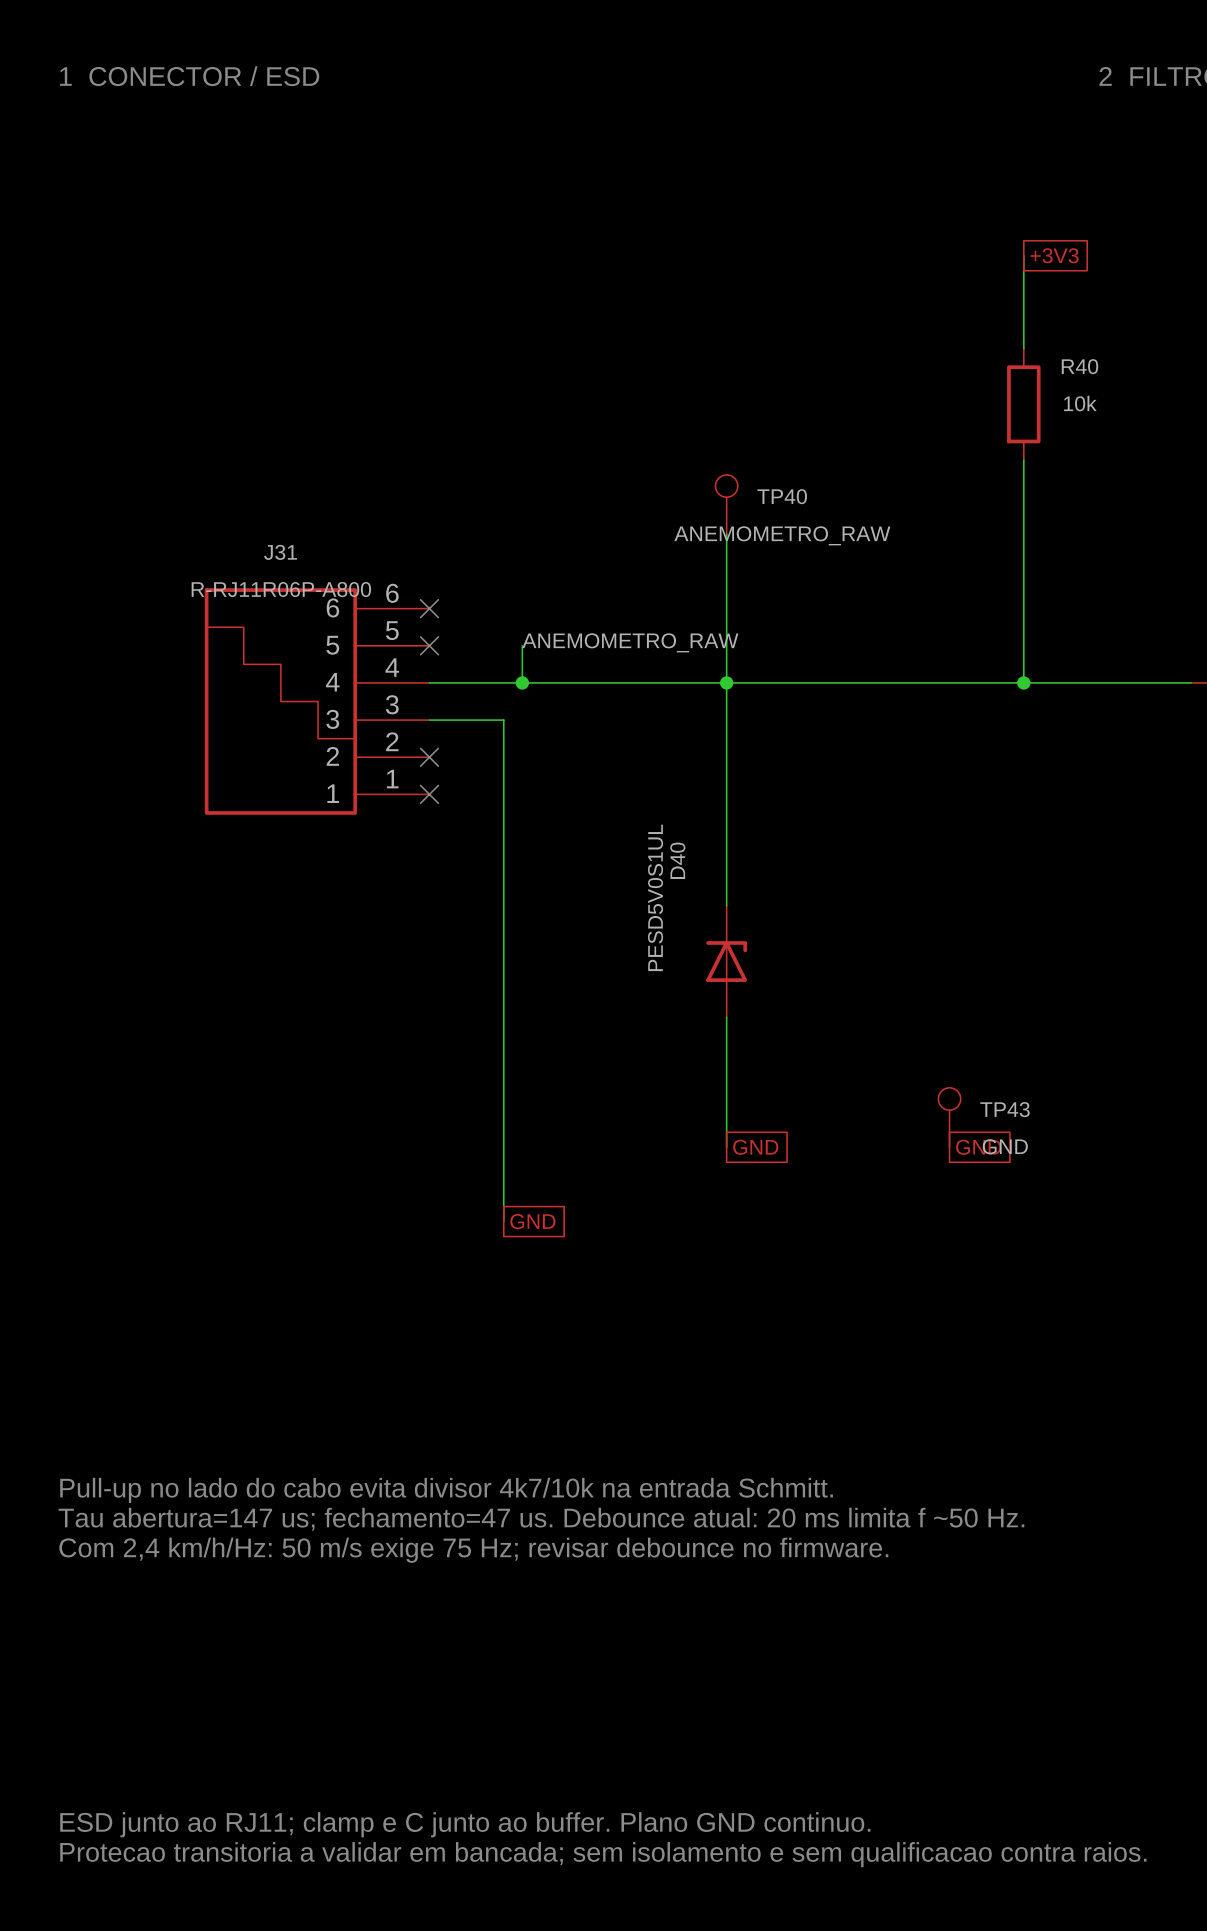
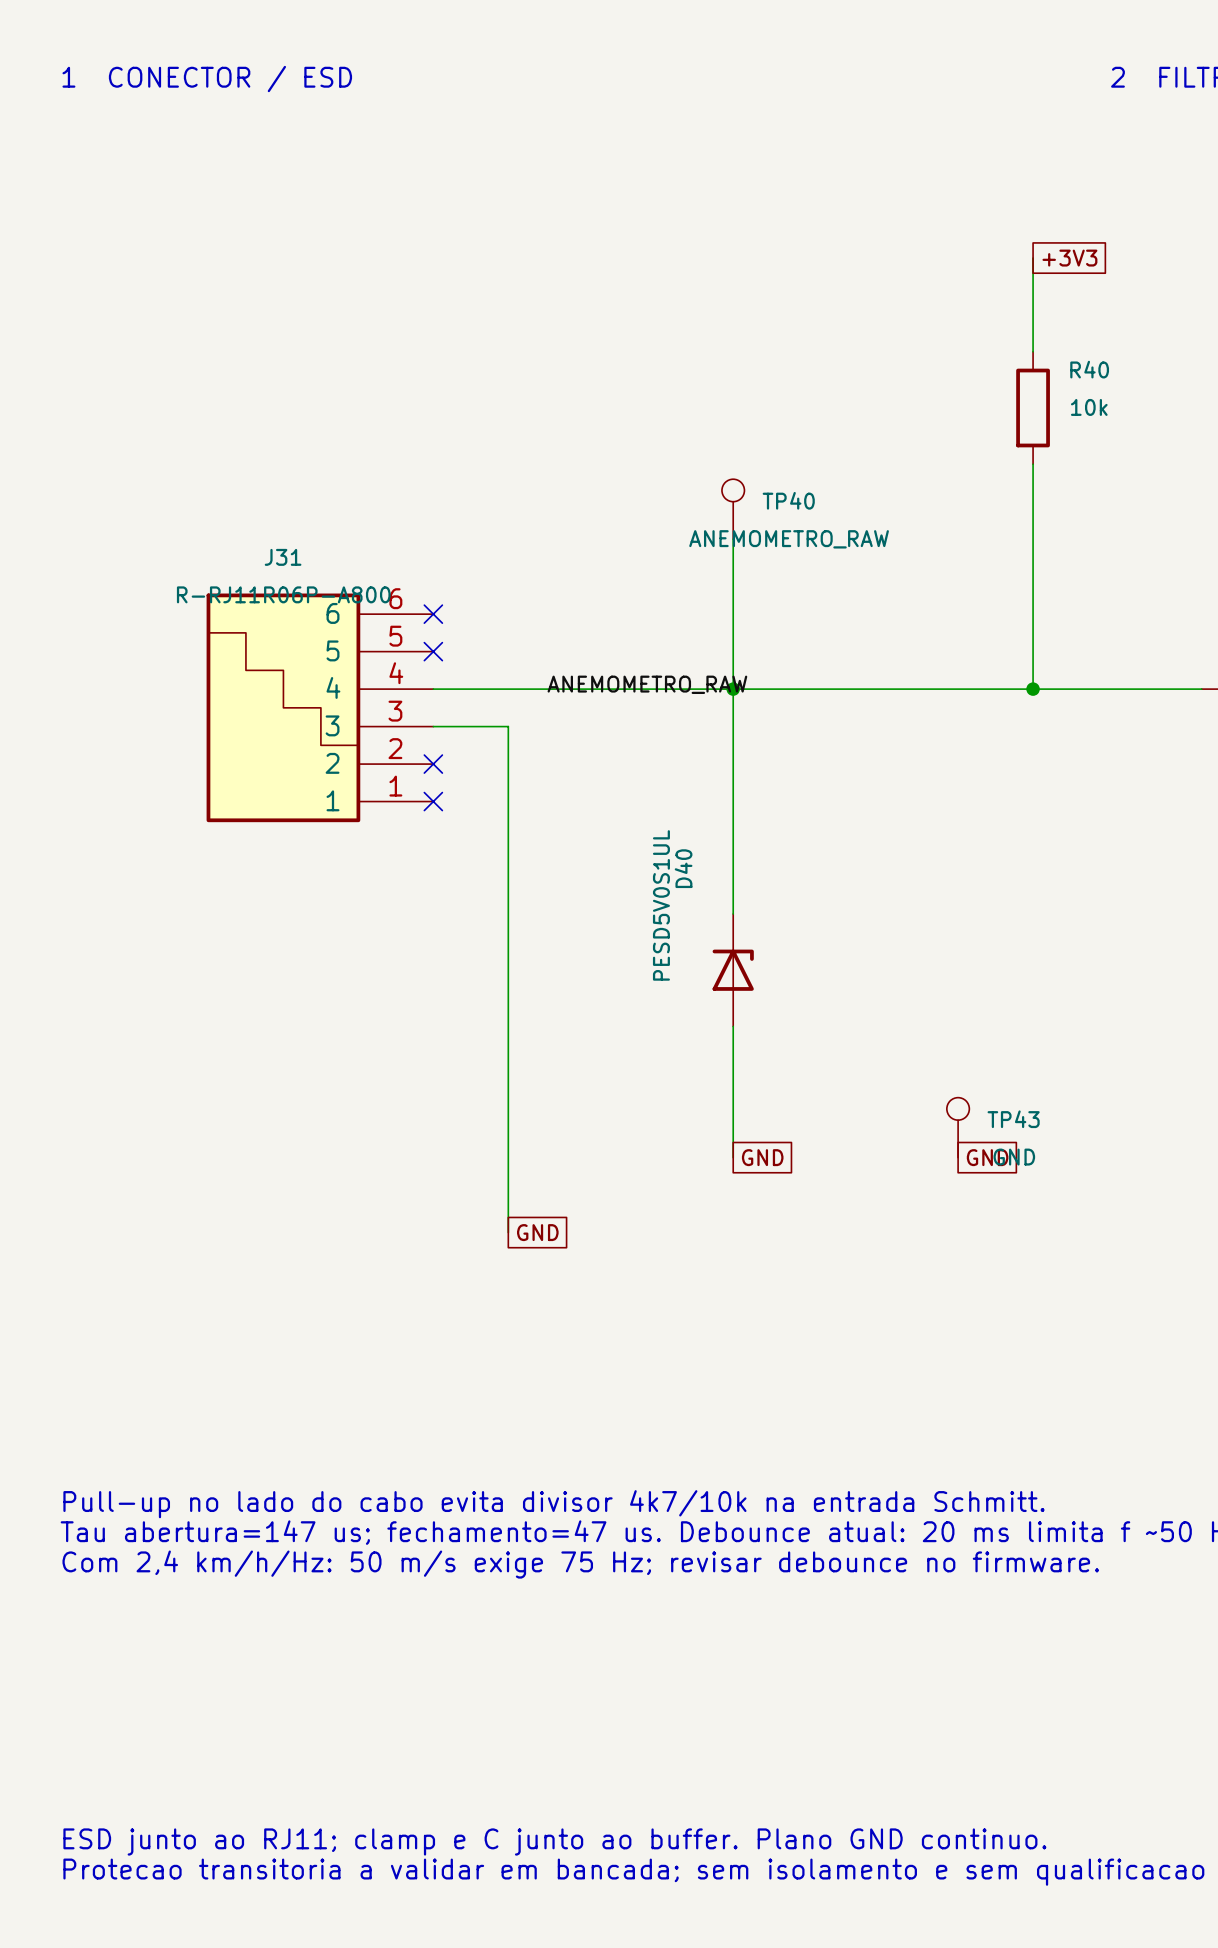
label position: ANEMOMETRO_RAW (630, 642) -> ANEMOMETRO_RAW (647, 684)
wire: (522, 645) (522, 682) -> none
junction: (522, 682) -> none

